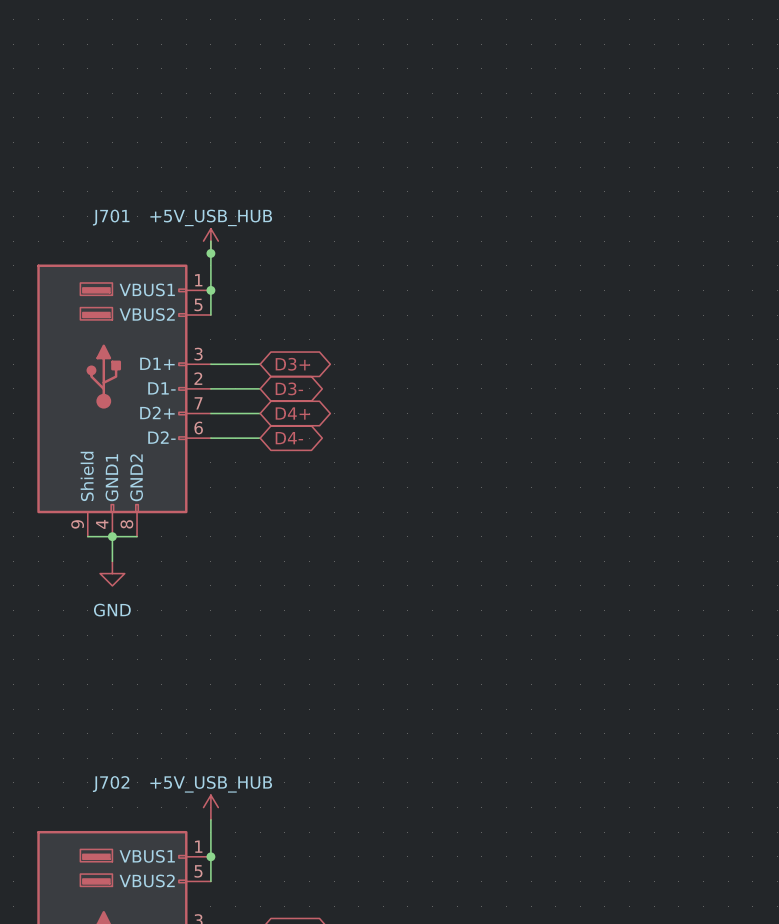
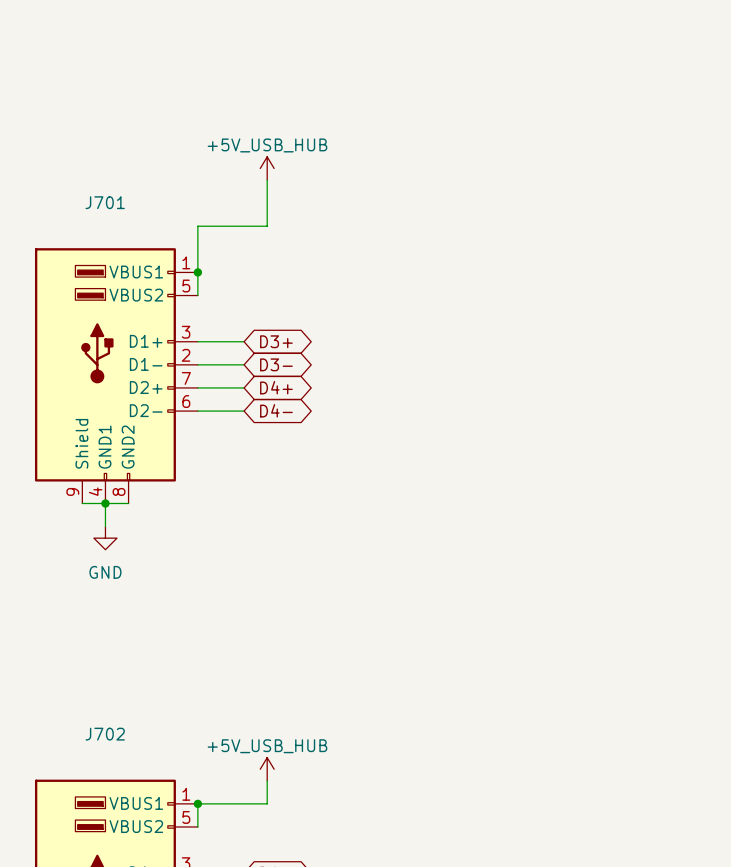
wire: none -> (267, 180) (267, 226) (197, 226)
power symbol position: +5V_USB_HUB (210, 241) -> +5V_USB_HUB (267, 168)
junction: (210, 253) -> none
power symbol position: +5V_USB_HUB (210, 807) -> +5V_USB_HUB (267, 769)
wire: (210, 819) (210, 856) -> (267, 780) (267, 803) (197, 803)

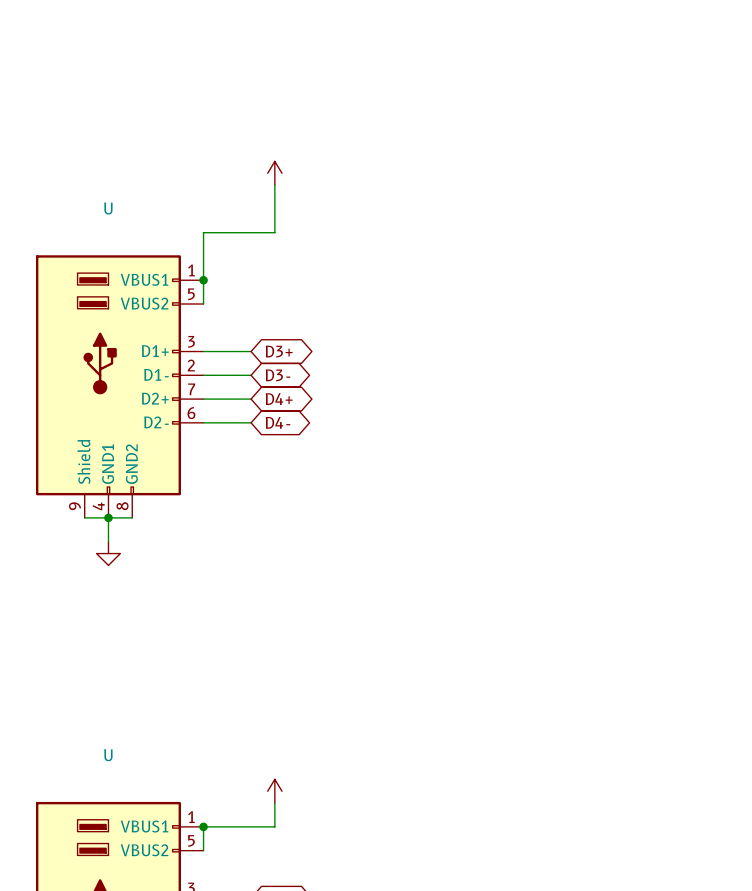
power symbol text: +5V_USB_HUB (267, 145) -> none
J701 name: J701 (105, 202) -> U (108, 208)
power symbol text: GND (105, 572) -> none
J702 name: J702 (105, 734) -> U (108, 755)
power symbol text: +5V_USB_HUB (267, 746) -> none

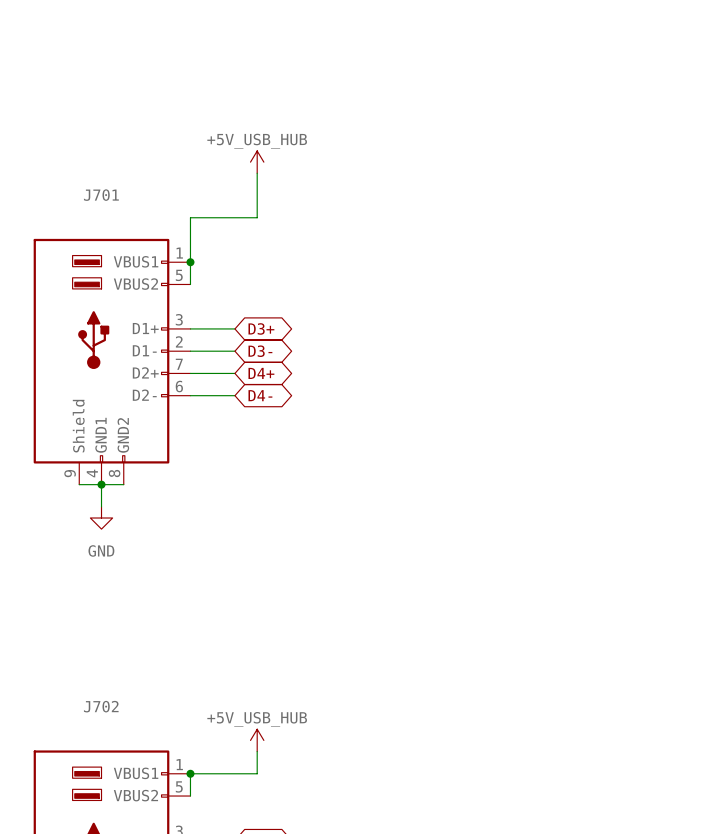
power symbol text: none -> +5V_USB_HUB (257, 141)
U name: U (108, 208) -> J701 (101, 195)
power symbol text: none -> GND (101, 550)
U name: U (108, 755) -> J702 (101, 706)
power symbol text: none -> +5V_USB_HUB (257, 719)

